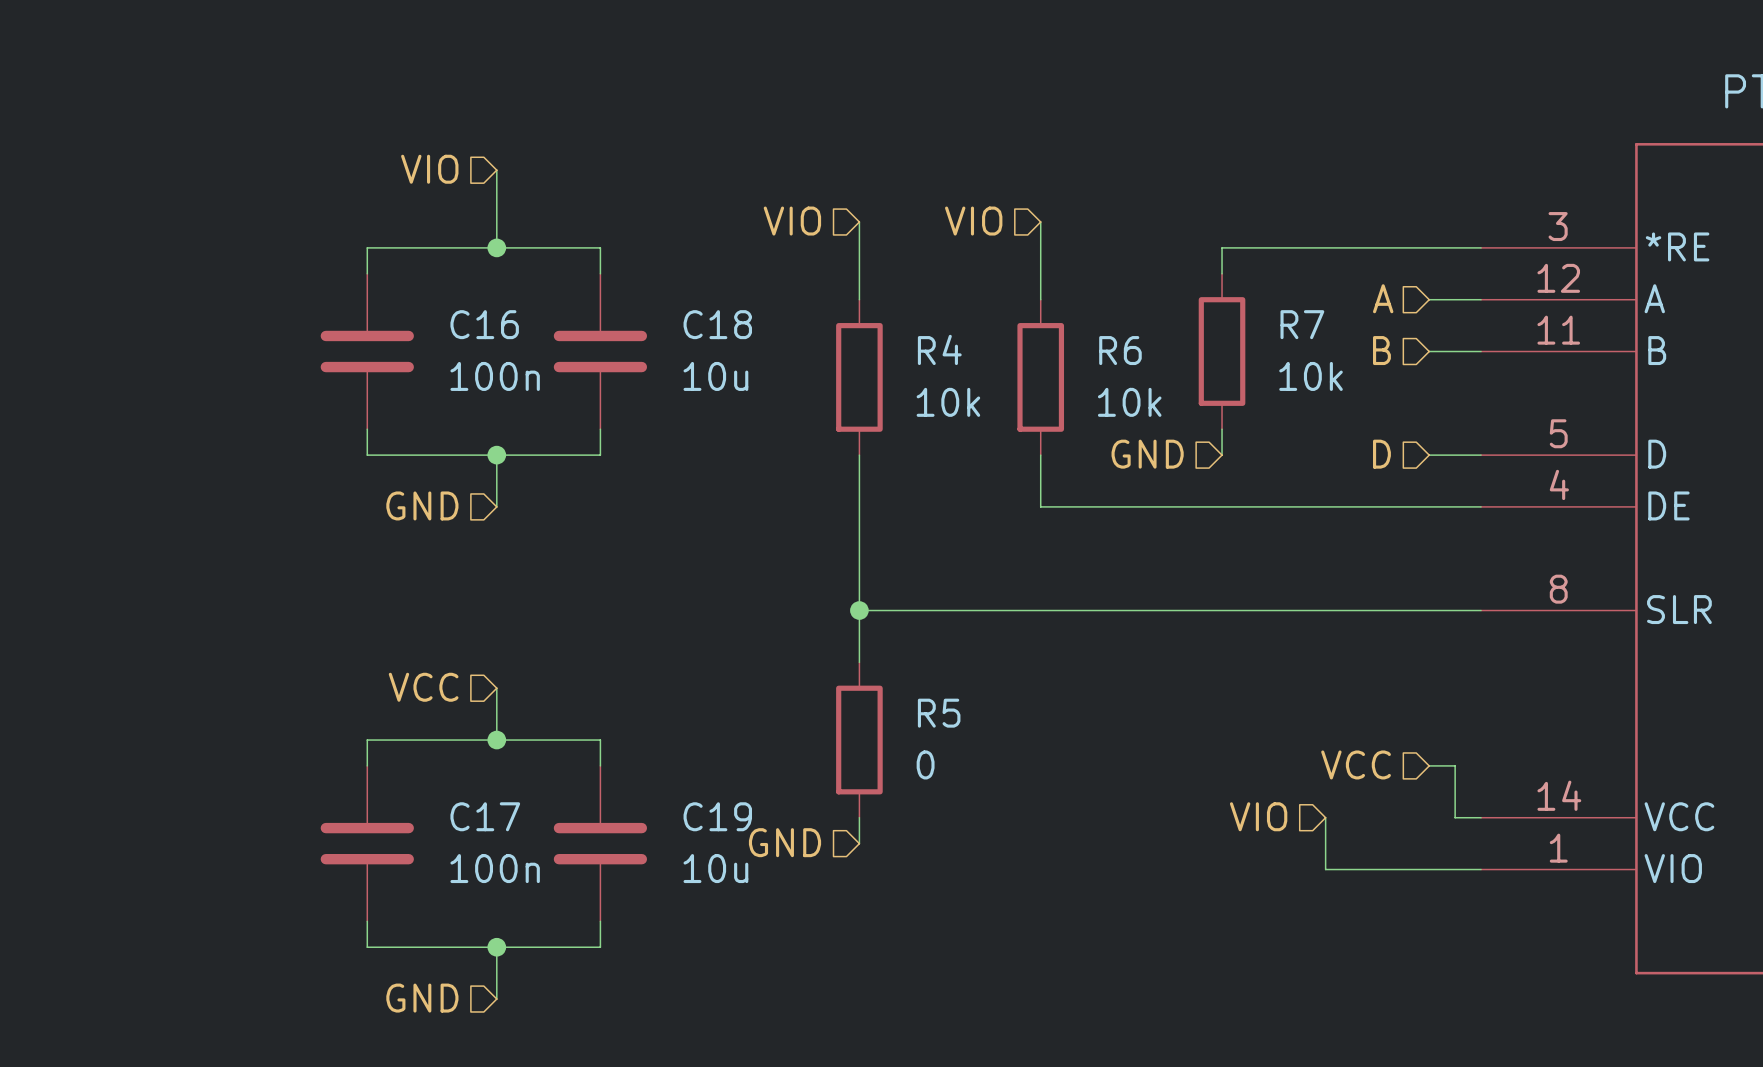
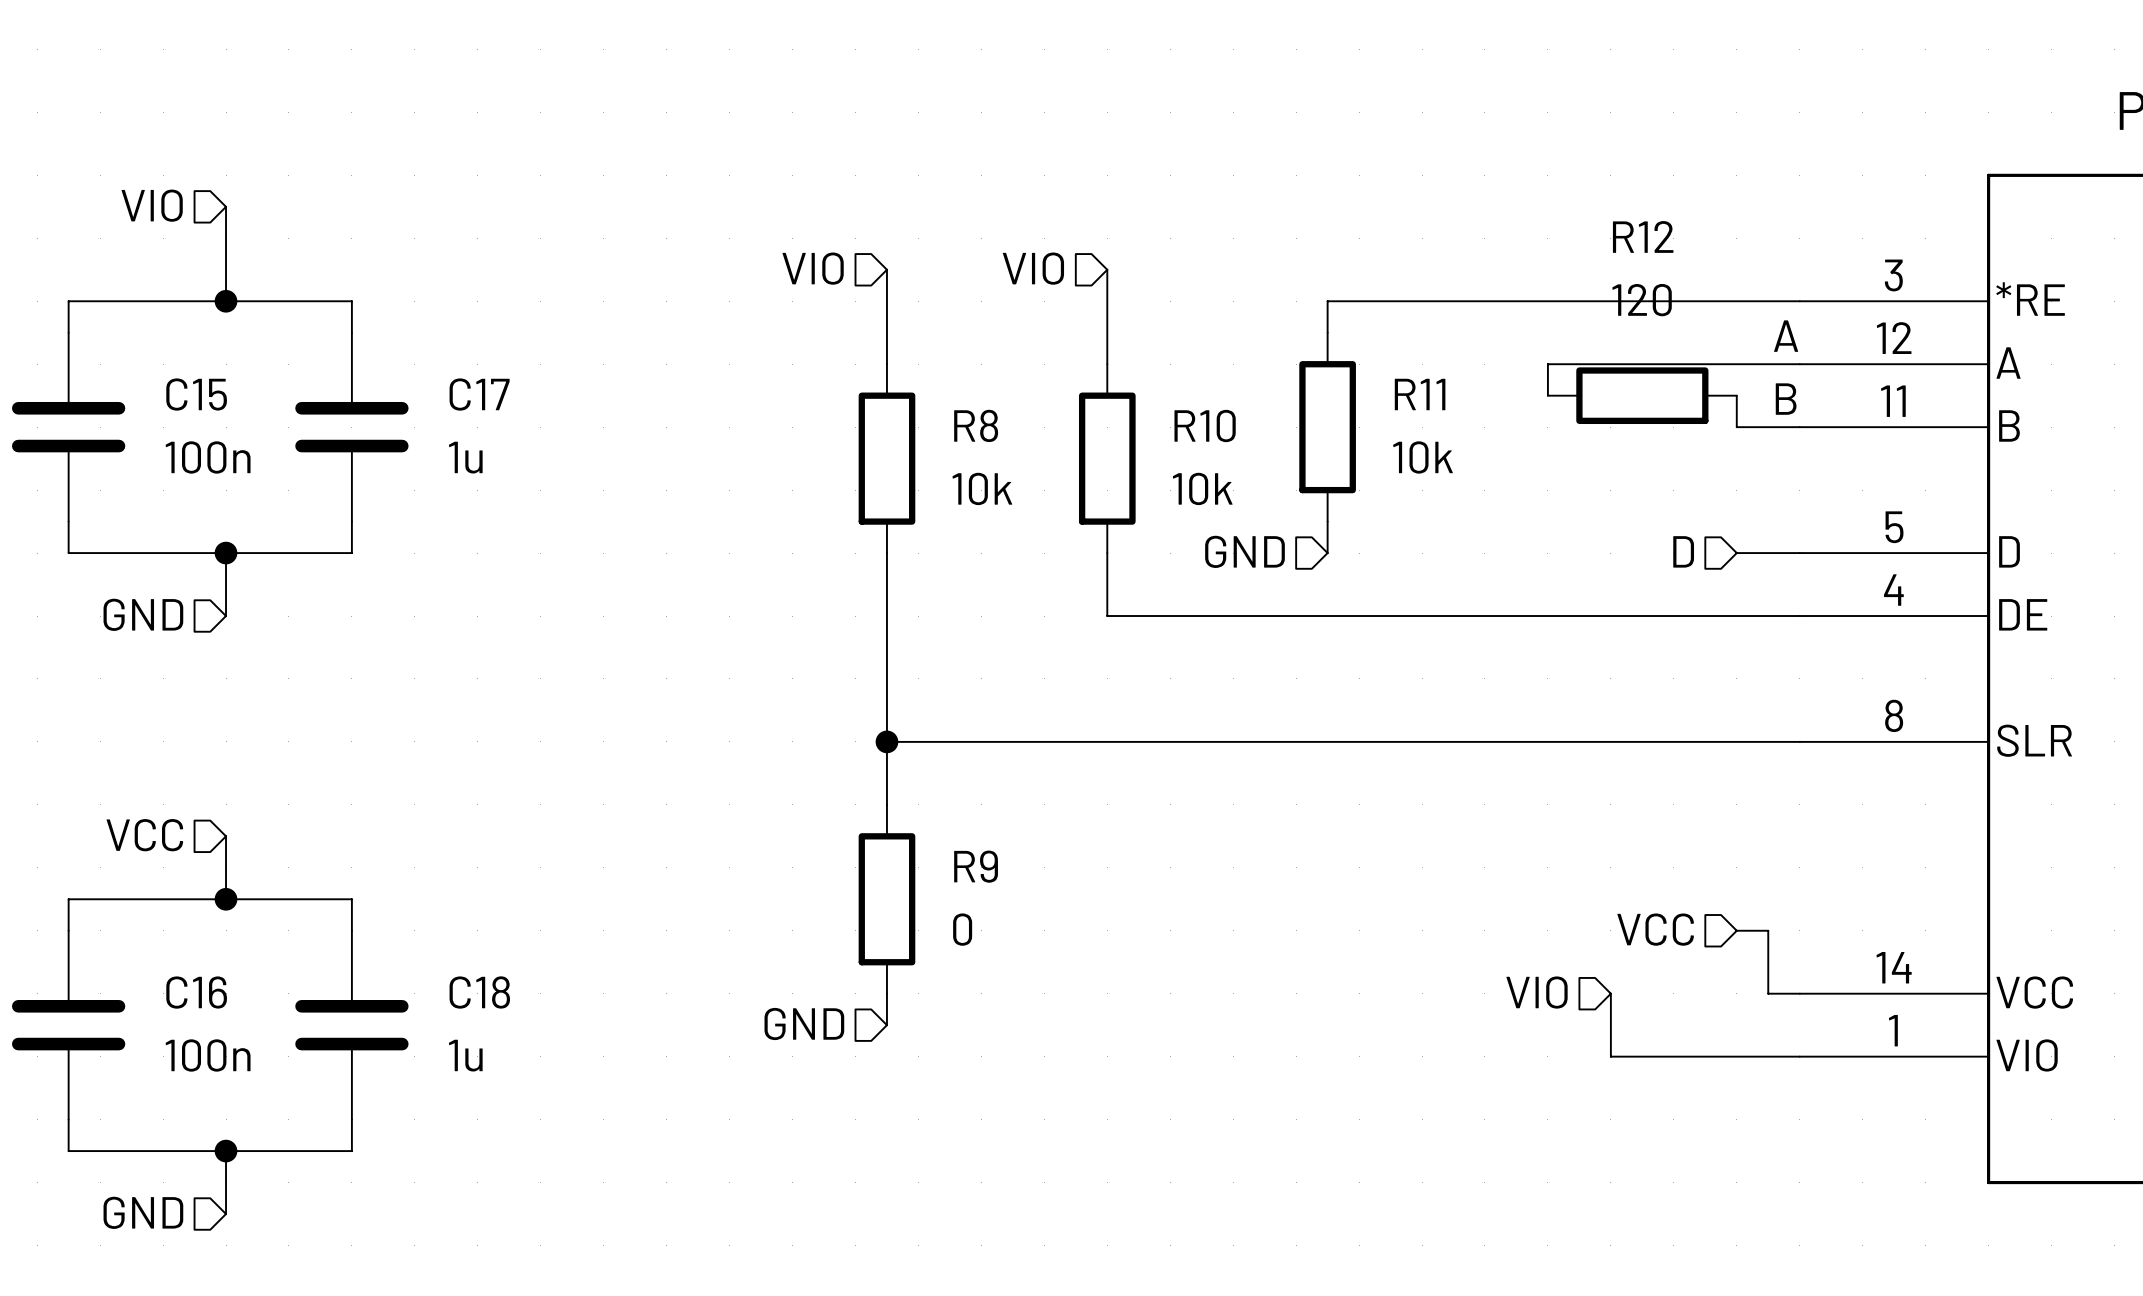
hierarchical label: none -> VIO (152, 205)
hierarchical label: VIO (429, 169) -> none
wire: (496, 170) (496, 247) -> (226, 206) (226, 301)
hierarchical label: none -> VIO (813, 268)
hierarchical label position: VIO (792, 221) -> VIO (1033, 268)
hierarchical label: VIO (973, 221) -> none
wire: (859, 222) (859, 299) -> (1107, 269) (1107, 364)
wire: (1040, 222) (1040, 299) -> (886, 269) (886, 364)
junction: none -> (226, 301)
junction: (496, 247) -> none
wire: (1222, 247) (1222, 273) -> (1484, 301) (1327, 301) (1327, 332)
wire: (367, 273) (367, 247) (600, 247) (600, 273) -> (68, 332) (68, 301) (351, 301) (351, 332)
label: none -> A (1786, 336)
hierarchical label: A (1383, 298) -> none
wire: none -> (1736, 364) (1547, 364) (1547, 395)
R12: none -> 120 (1642, 395)
wire: none -> (1736, 395) (1736, 427)
label: none -> B (1786, 399)
hierarchical label: B (1381, 350) -> none
C15: none -> 100n (68, 427)
C16 position: (367, 351) -> (68, 1025)
C18 position: (600, 351) -> (351, 1025)
R11: none -> 10k (1327, 427)
R7: 10k (1222, 351) -> none
C18 value: 10u (715, 376) -> 1u (465, 1055)
R8: none -> 10k (886, 458)
R4: 10k (859, 377) -> none
R10: none -> 10k (1107, 458)
R6: 10k (1040, 377) -> none
wire: (367, 429) (367, 455) (600, 455) (600, 429) -> (68, 521) (68, 553) (351, 553) (351, 521)
wire: (1222, 429) (1222, 455) -> (1327, 521) (1327, 553)
hierarchical label position: GND (1147, 454) -> GND (1245, 551)
junction: none -> (226, 553)
wire: (496, 455) (496, 506) -> (226, 553) (226, 616)
junction: (496, 455) -> none
wire: (859, 455) (859, 662) -> (886, 553) (886, 804)
wire: (1040, 455) (1040, 506) -> (1107, 553) (1107, 616) (1264, 616)
hierarchical label: none -> GND (143, 614)
hierarchical label: GND (422, 505) -> none
wire: none -> (886, 741) (1044, 741)
junction: none -> (886, 741)
junction: (859, 610) -> none
hierarchical label position: VCC (423, 687) -> VCC (144, 835)
wire: (496, 688) (496, 740) -> (226, 836) (226, 899)
junction: none -> (226, 899)
junction: (496, 740) -> none
R9: none -> 0 (886, 899)
R5: 0 (859, 740) -> none
wire: (367, 765) (367, 740) (600, 740) (600, 765) -> (68, 930) (68, 899) (351, 899) (351, 930)
wire: (859, 817) (859, 843) -> (886, 993) (886, 1025)
hierarchical label position: GND (785, 842) -> GND (804, 1024)
C17 position: (367, 843) -> (351, 427)
C19: 10u (600, 843) -> none
C17 value: 100n (495, 868) -> 1u (465, 457)
wire: (367, 921) (367, 947) (600, 947) (600, 921) -> (68, 1119) (68, 1151) (351, 1151) (351, 1119)
junction: none -> (226, 1151)
wire: (496, 947) (496, 999) -> (226, 1151) (226, 1214)
junction: (496, 947) -> none
hierarchical label: none -> GND (143, 1212)
hierarchical label: GND (422, 998) -> none

